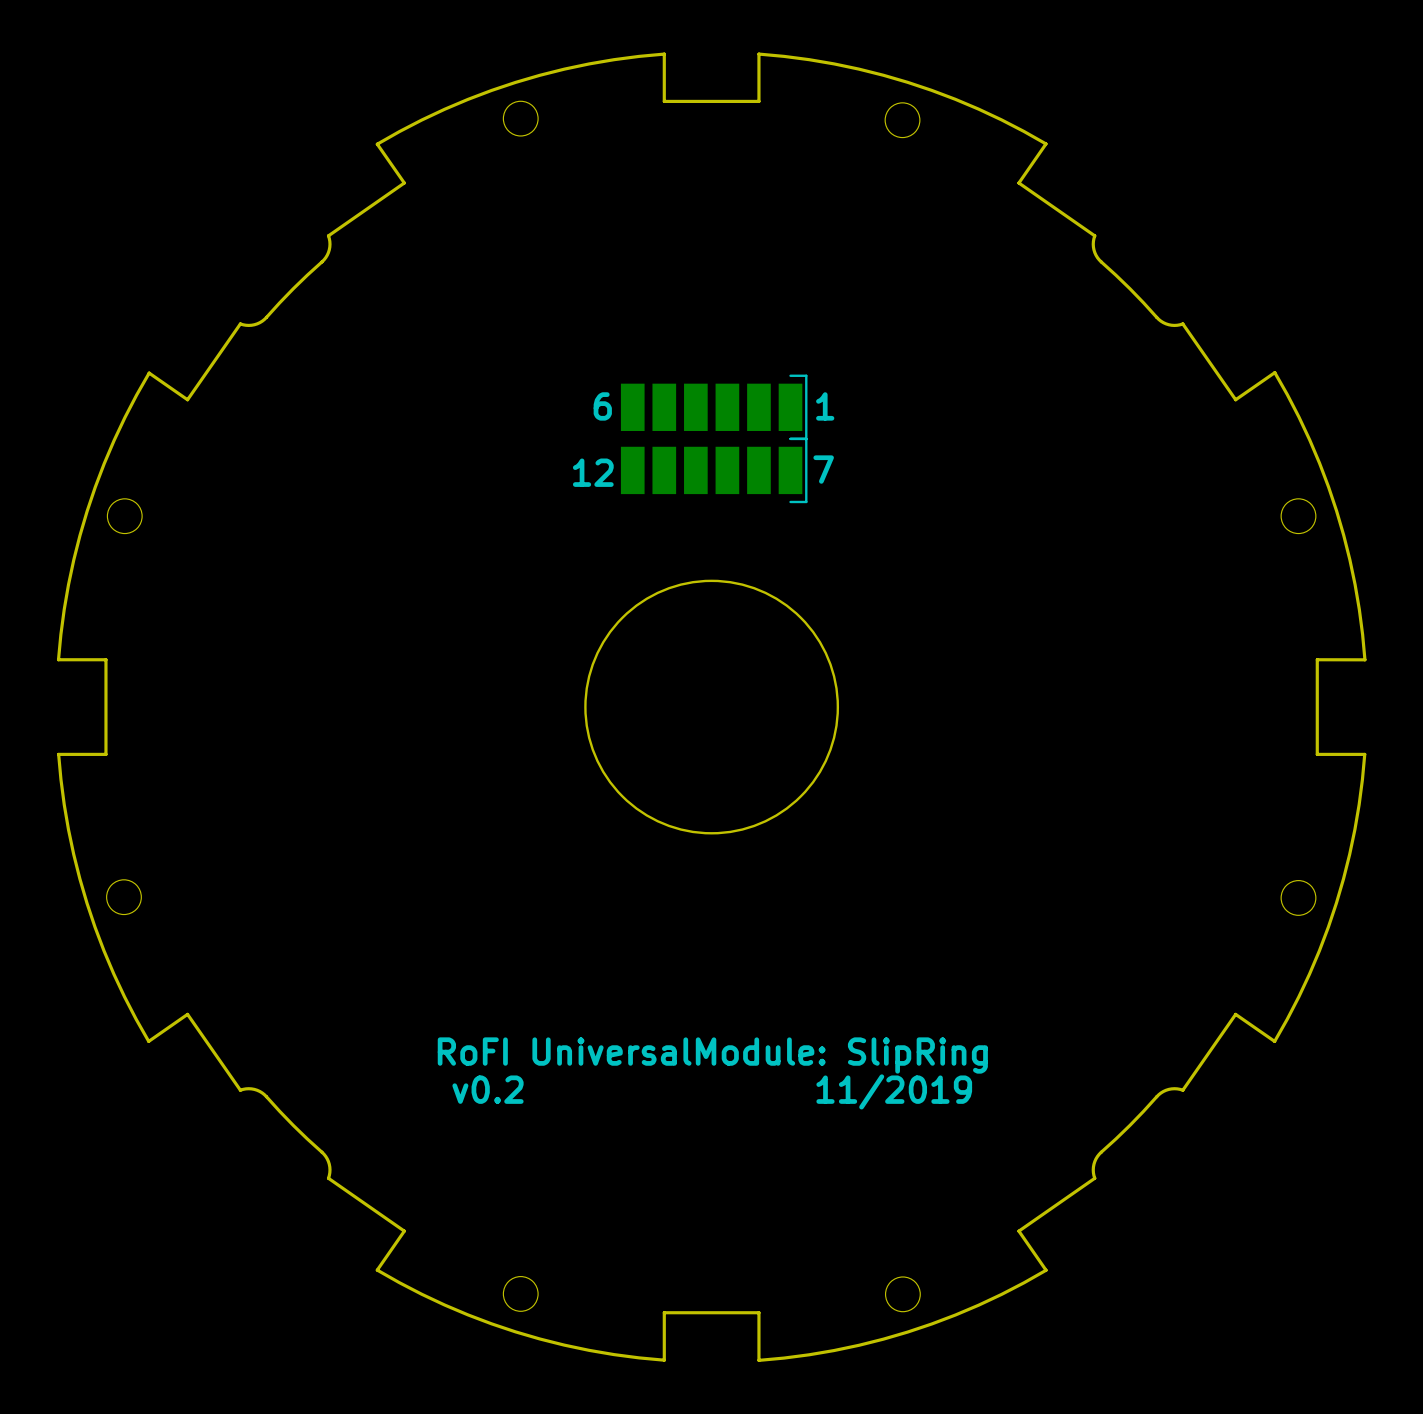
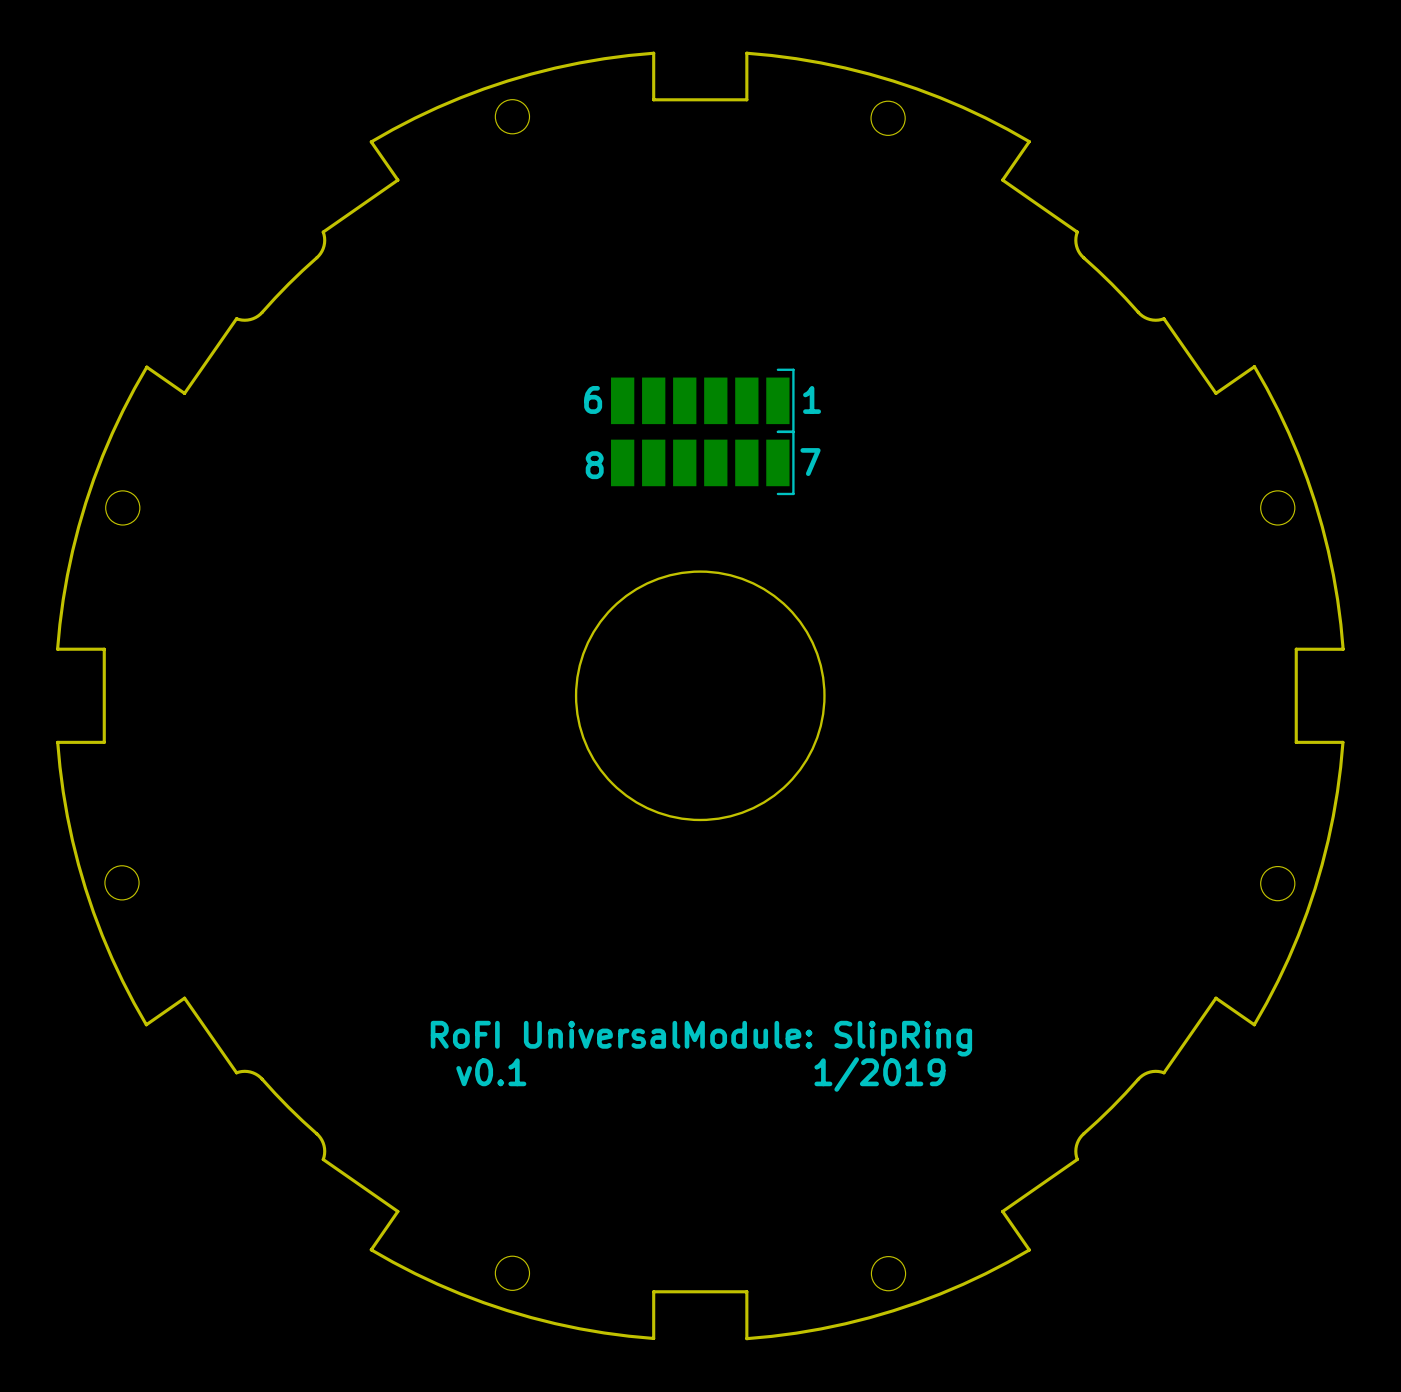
text: 12 (593, 472) -> 8 (594, 465)
text: v0.2 11/2019 (712, 1091) -> v0.1 1/2019 (700, 1074)

